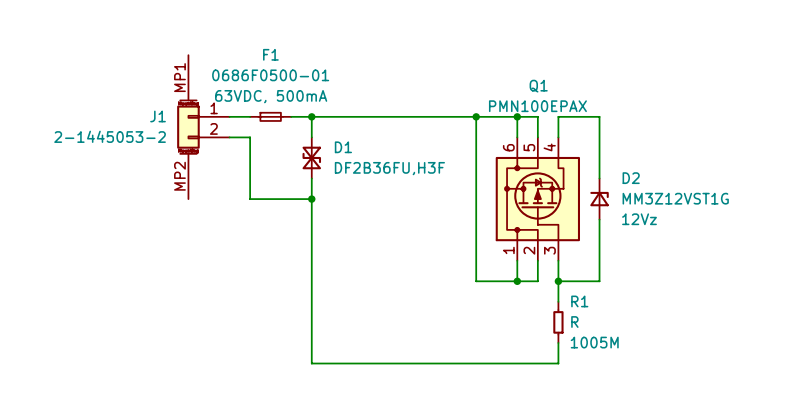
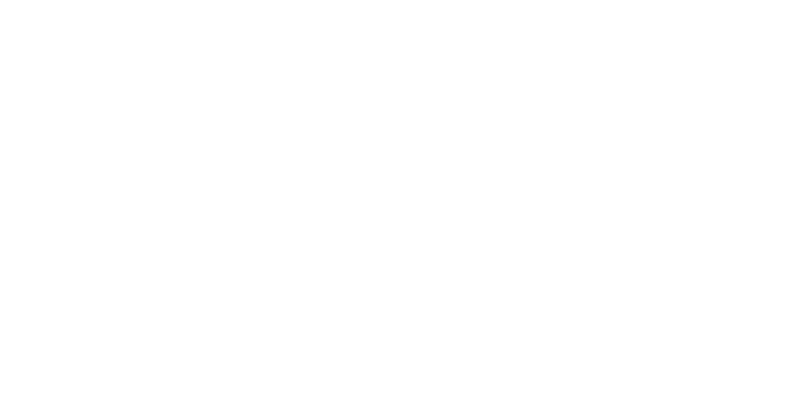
wire: (229, 116) (250, 116) -> none
F1: 0686F0500-01 (270, 116) -> none
wire: (291, 116) (537, 116) (537, 137) -> none
wire: (311, 116) (311, 137) -> none
junction: (311, 116) -> none
wire: (476, 116) (476, 281) (537, 281) (537, 260) -> none
junction: (476, 116) -> none
wire: (517, 116) (517, 137) -> none
junction: (517, 116) -> none
J1: 2-1445053-2 (203, 127) -> none
wire: (229, 137) (250, 137) (250, 199) (311, 199) -> none
wire: (558, 137) (558, 116) (599, 116) (599, 178) -> none
D1: DF2B36FU,H3F (311, 157) -> none
wire: (311, 178) (311, 363) (558, 363) (558, 342) -> none
junction: (311, 199) -> none
Q1: PMN100EPAX (537, 199) -> none
D2: MM3Z12VST1G (599, 199) -> none
wire: (599, 219) (599, 281) (558, 281) -> none
wire: (517, 260) (517, 281) -> none
wire: (558, 260) (558, 301) -> none
junction: (517, 281) -> none
junction: (558, 281) -> none
R1: R (558, 322) -> none

